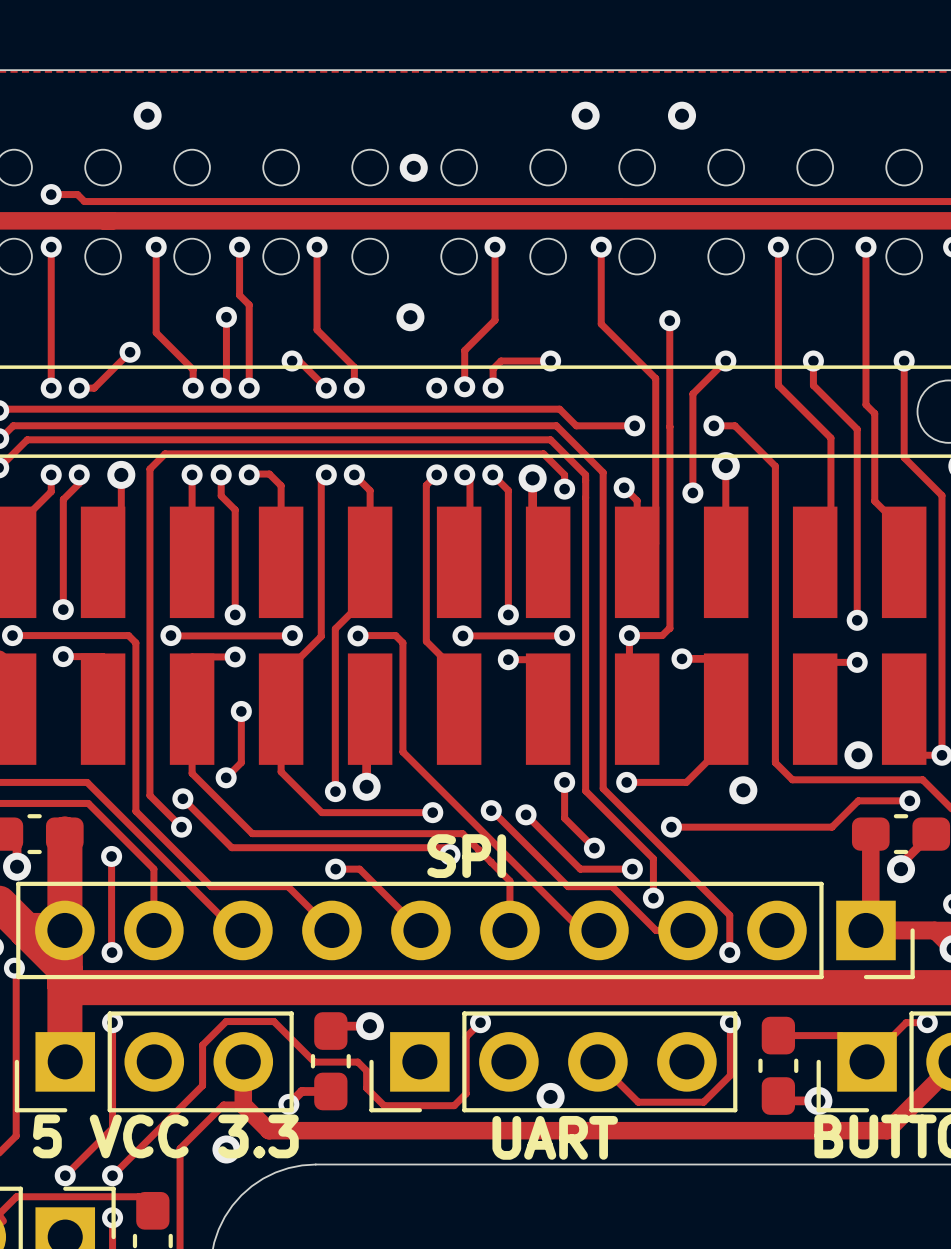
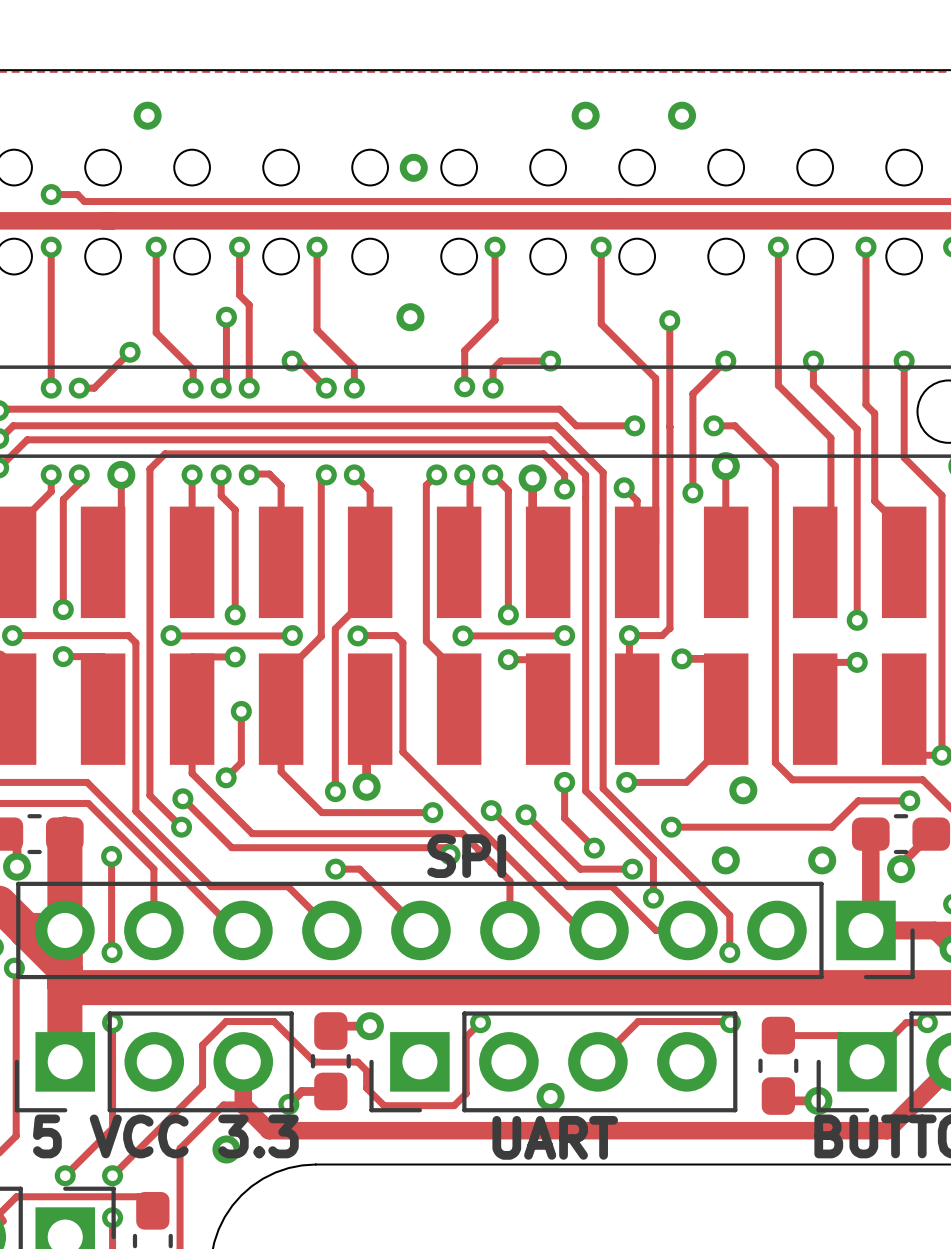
via: (436, 388) -> none
via: (858, 755) -> none
via: none -> (725, 860)
via: none -> (822, 860)
track: (730, 1024) (730, 1075) (703, 1102) (638, 1102) (597, 1061) -> (730, 1022) (638, 1021) (597, 1061)

